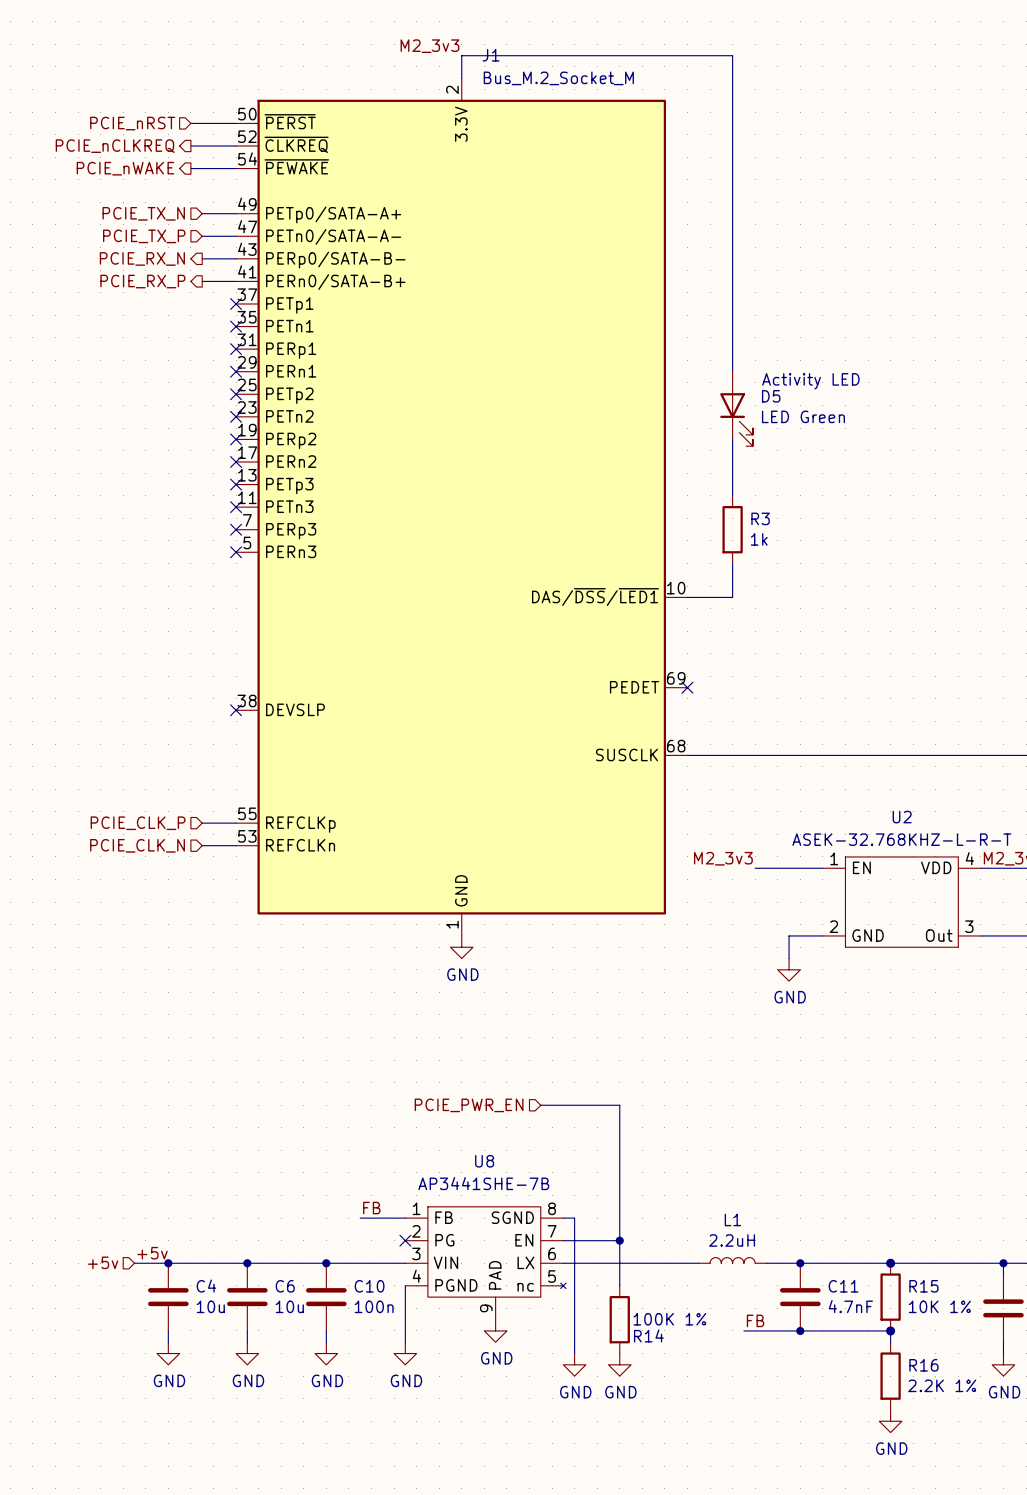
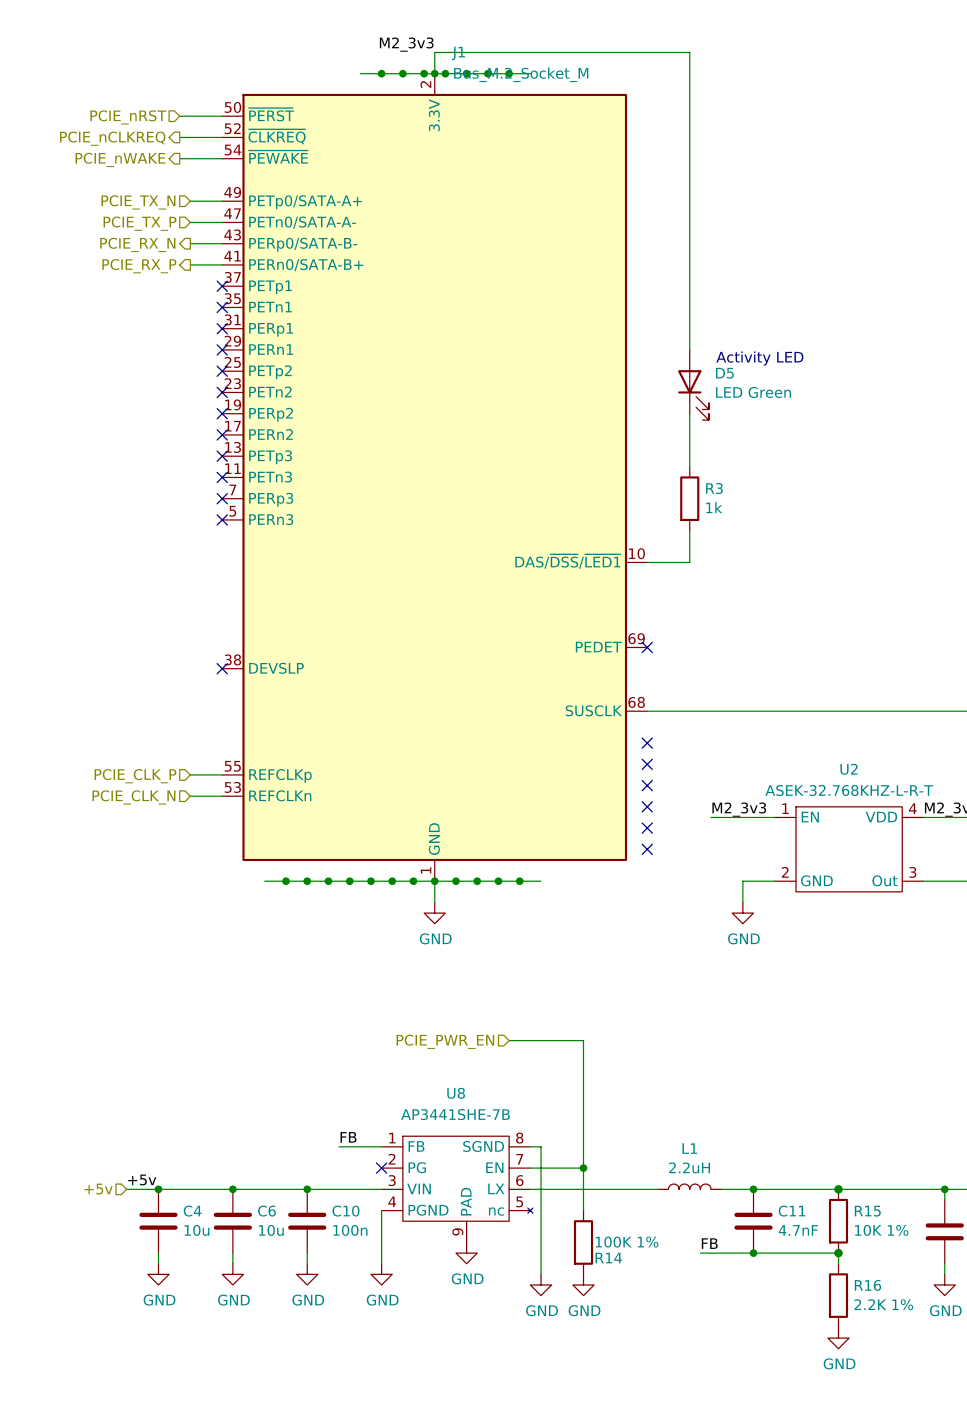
wire: none -> (360, 73) (530, 73)
junction: none -> (381, 73)
junction: none -> (402, 73)
junction: none -> (424, 73)
junction: none -> (434, 73)
junction: none -> (445, 73)
junction: none -> (466, 73)
junction: none -> (487, 73)
junction: none -> (509, 73)
no-connect mark: none -> (647, 743)
no-connect mark: none -> (647, 764)
no-connect mark: none -> (647, 785)
no-connect mark: none -> (647, 806)
label position: M2_3v3 (723, 858) -> M2_3v3 (739, 809)
no-connect mark: none -> (647, 828)
no-connect mark: none -> (647, 849)
wire: none -> (264, 881) (541, 881)
junction: none -> (285, 881)
junction: none -> (307, 881)
junction: none -> (328, 881)
junction: none -> (349, 881)
junction: none -> (370, 881)
junction: none -> (392, 881)
junction: none -> (413, 881)
junction: none -> (434, 881)
junction: none -> (455, 881)
junction: none -> (477, 881)
junction: none -> (498, 881)
junction: none -> (519, 881)
power symbol position: GND (461, 947) -> GND (434, 913)

